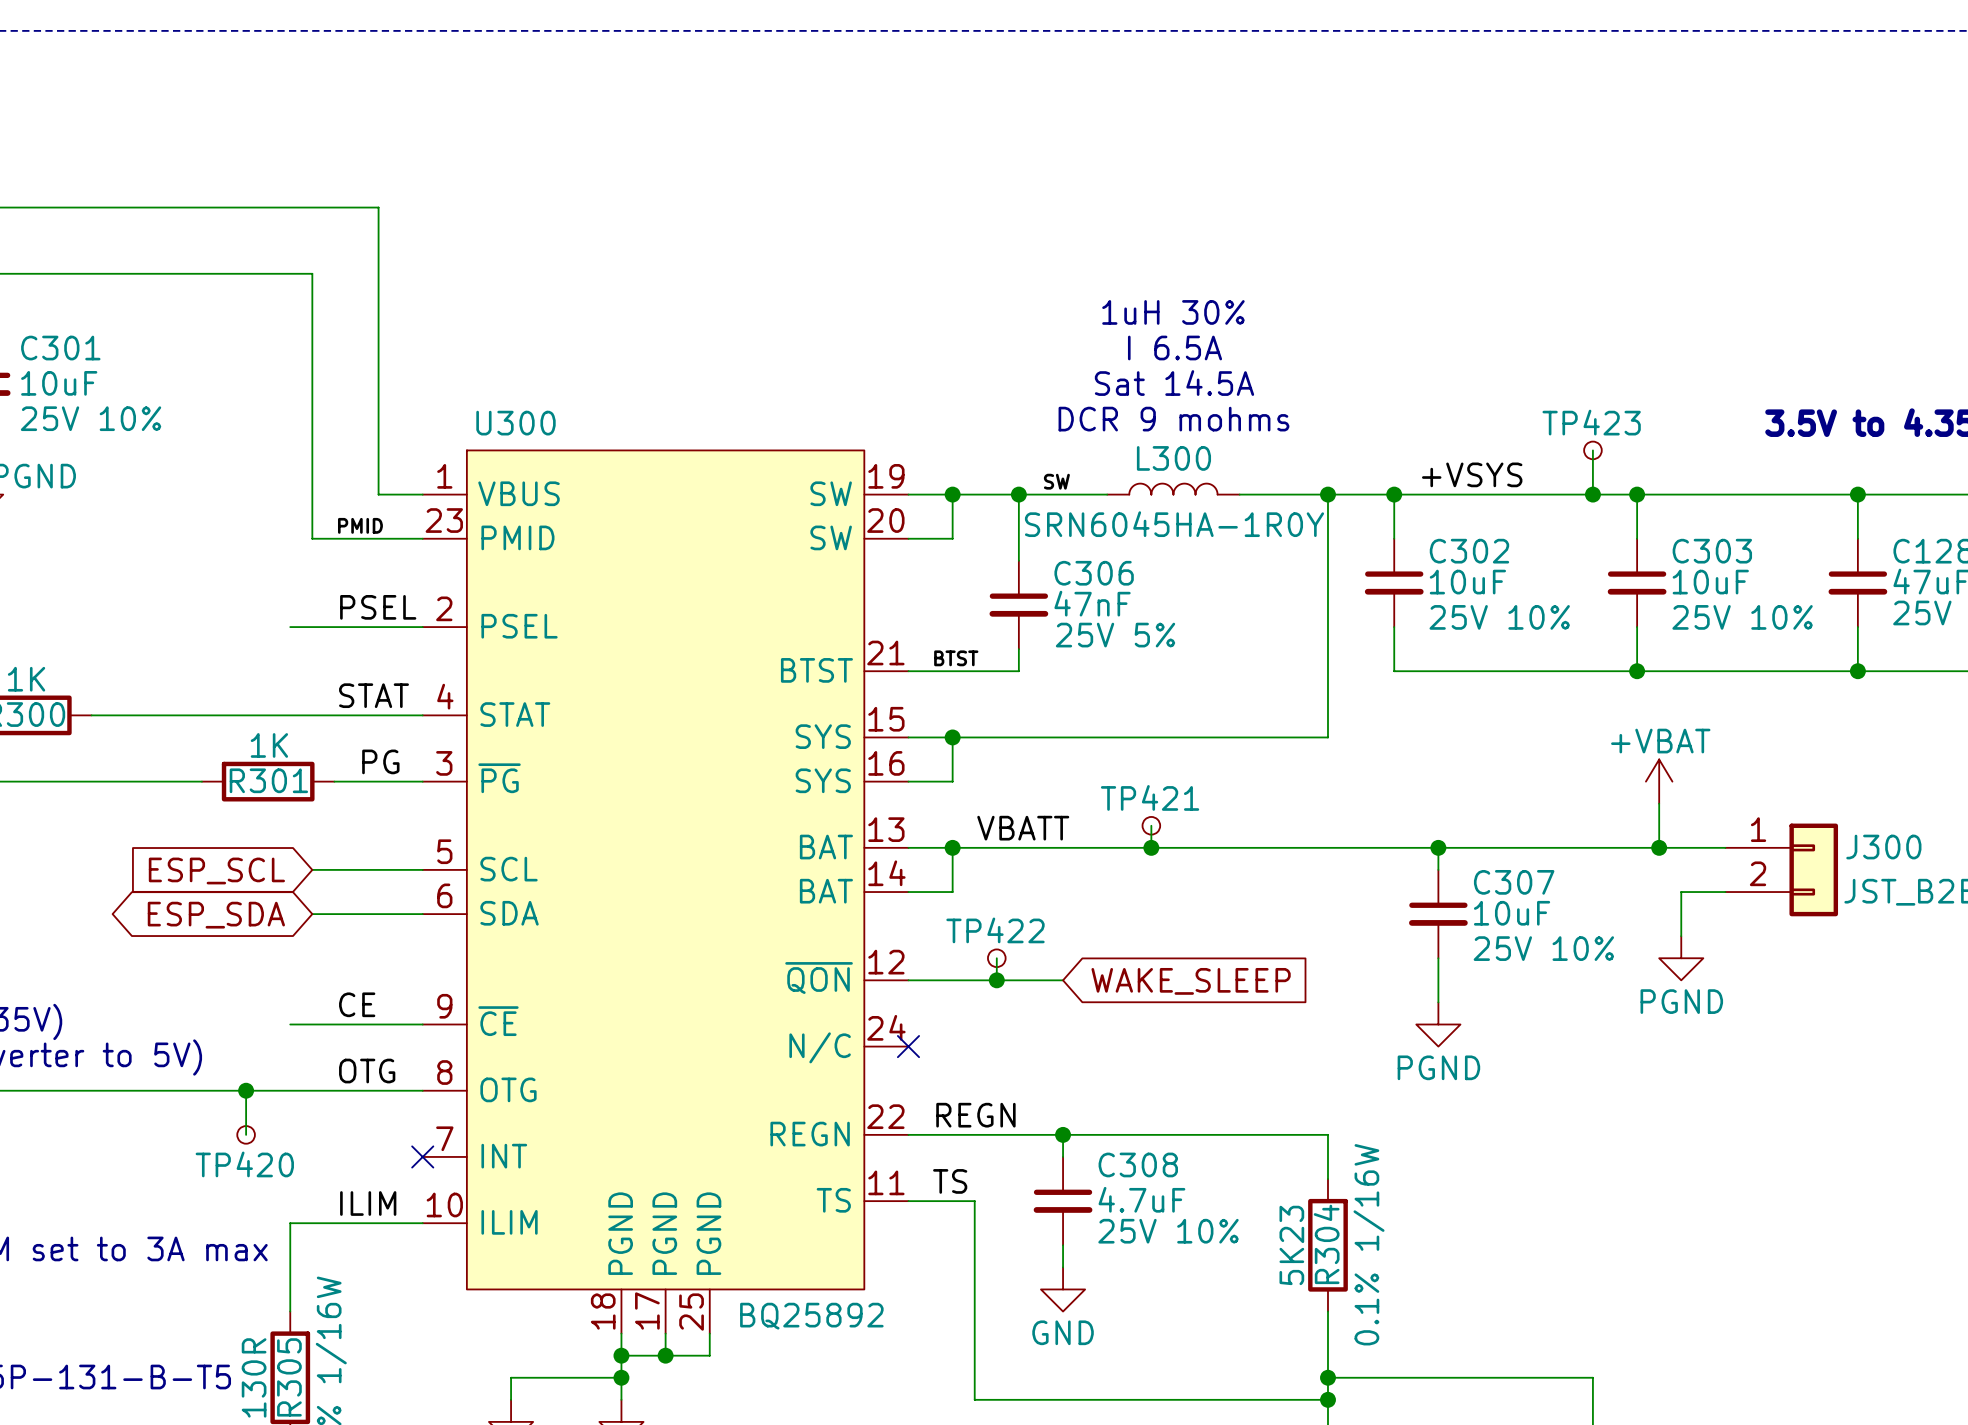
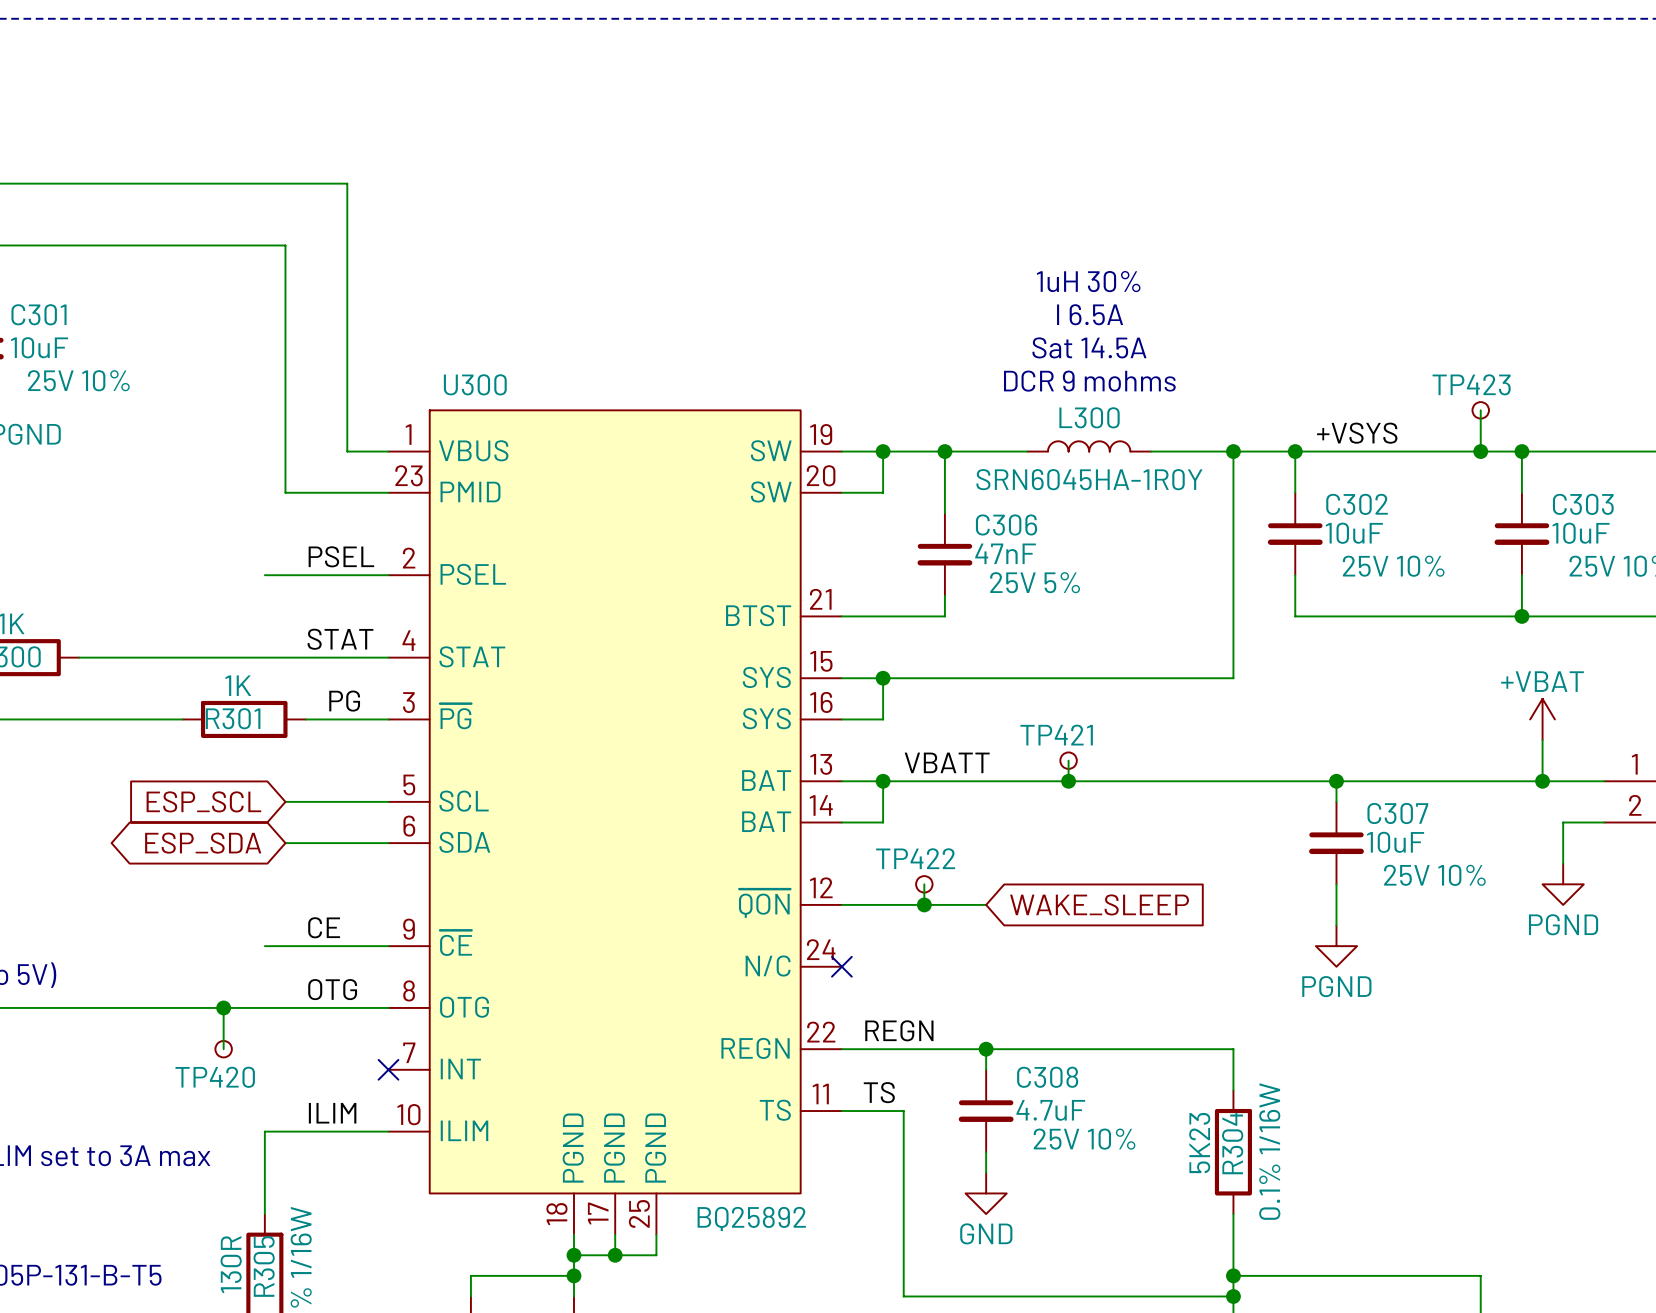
label: SW (1056, 481) -> none
label: PMID (360, 525) -> none
label: BTST (956, 658) -> none

